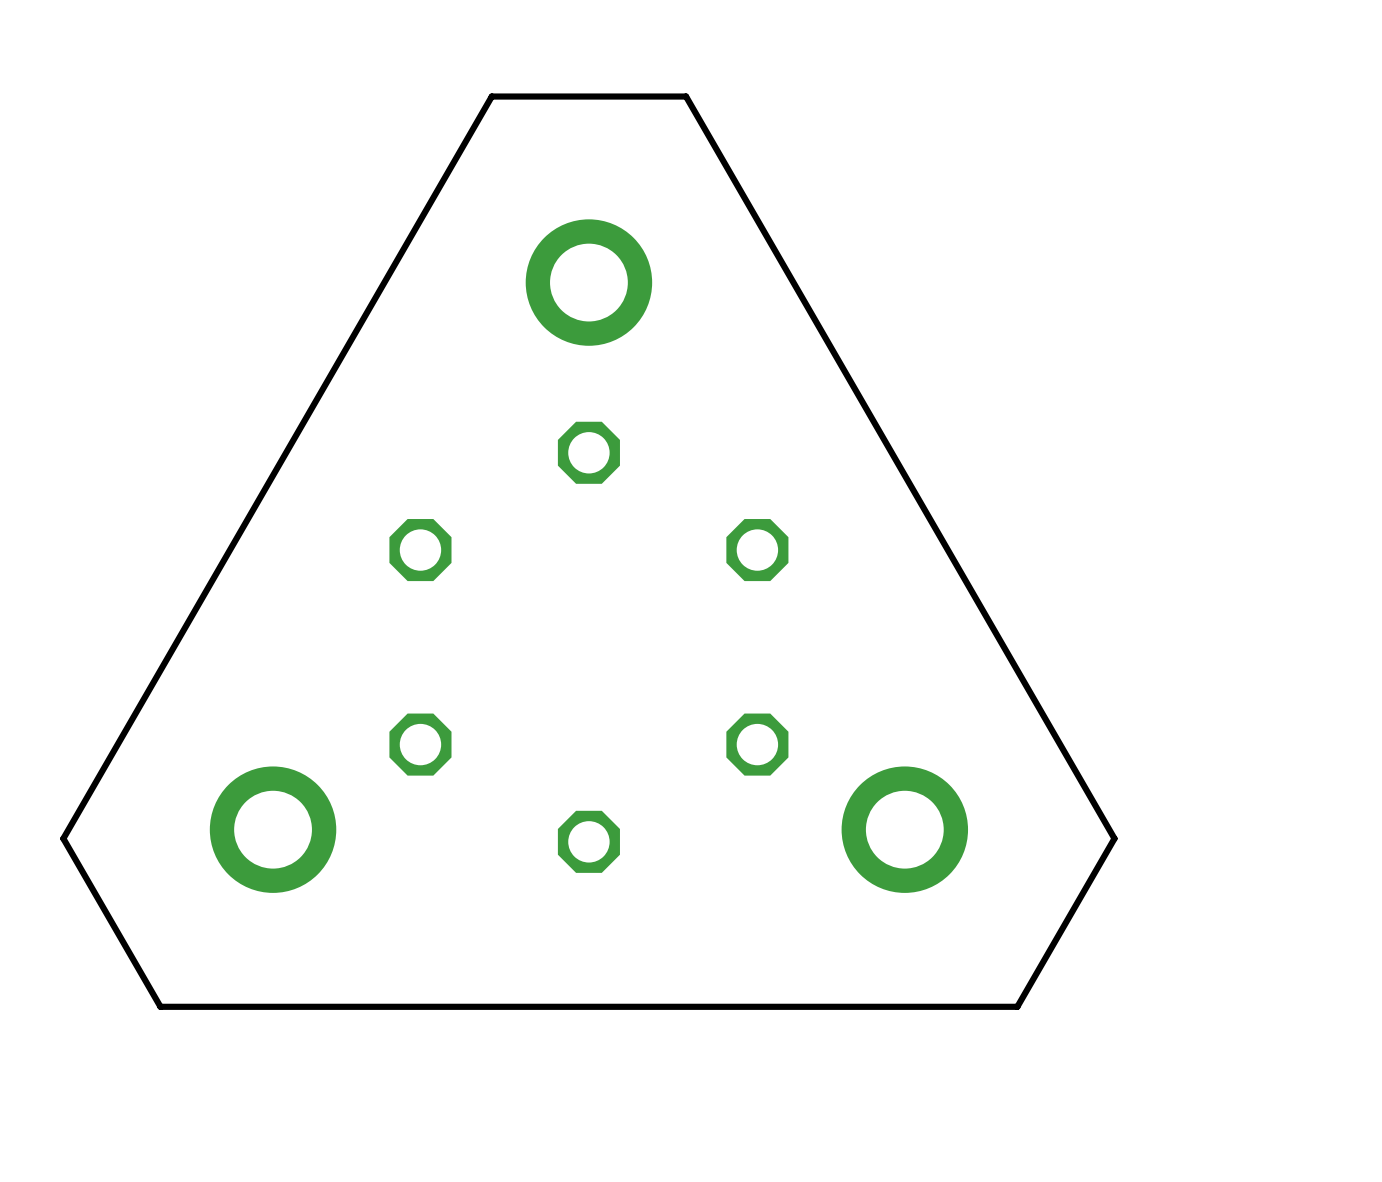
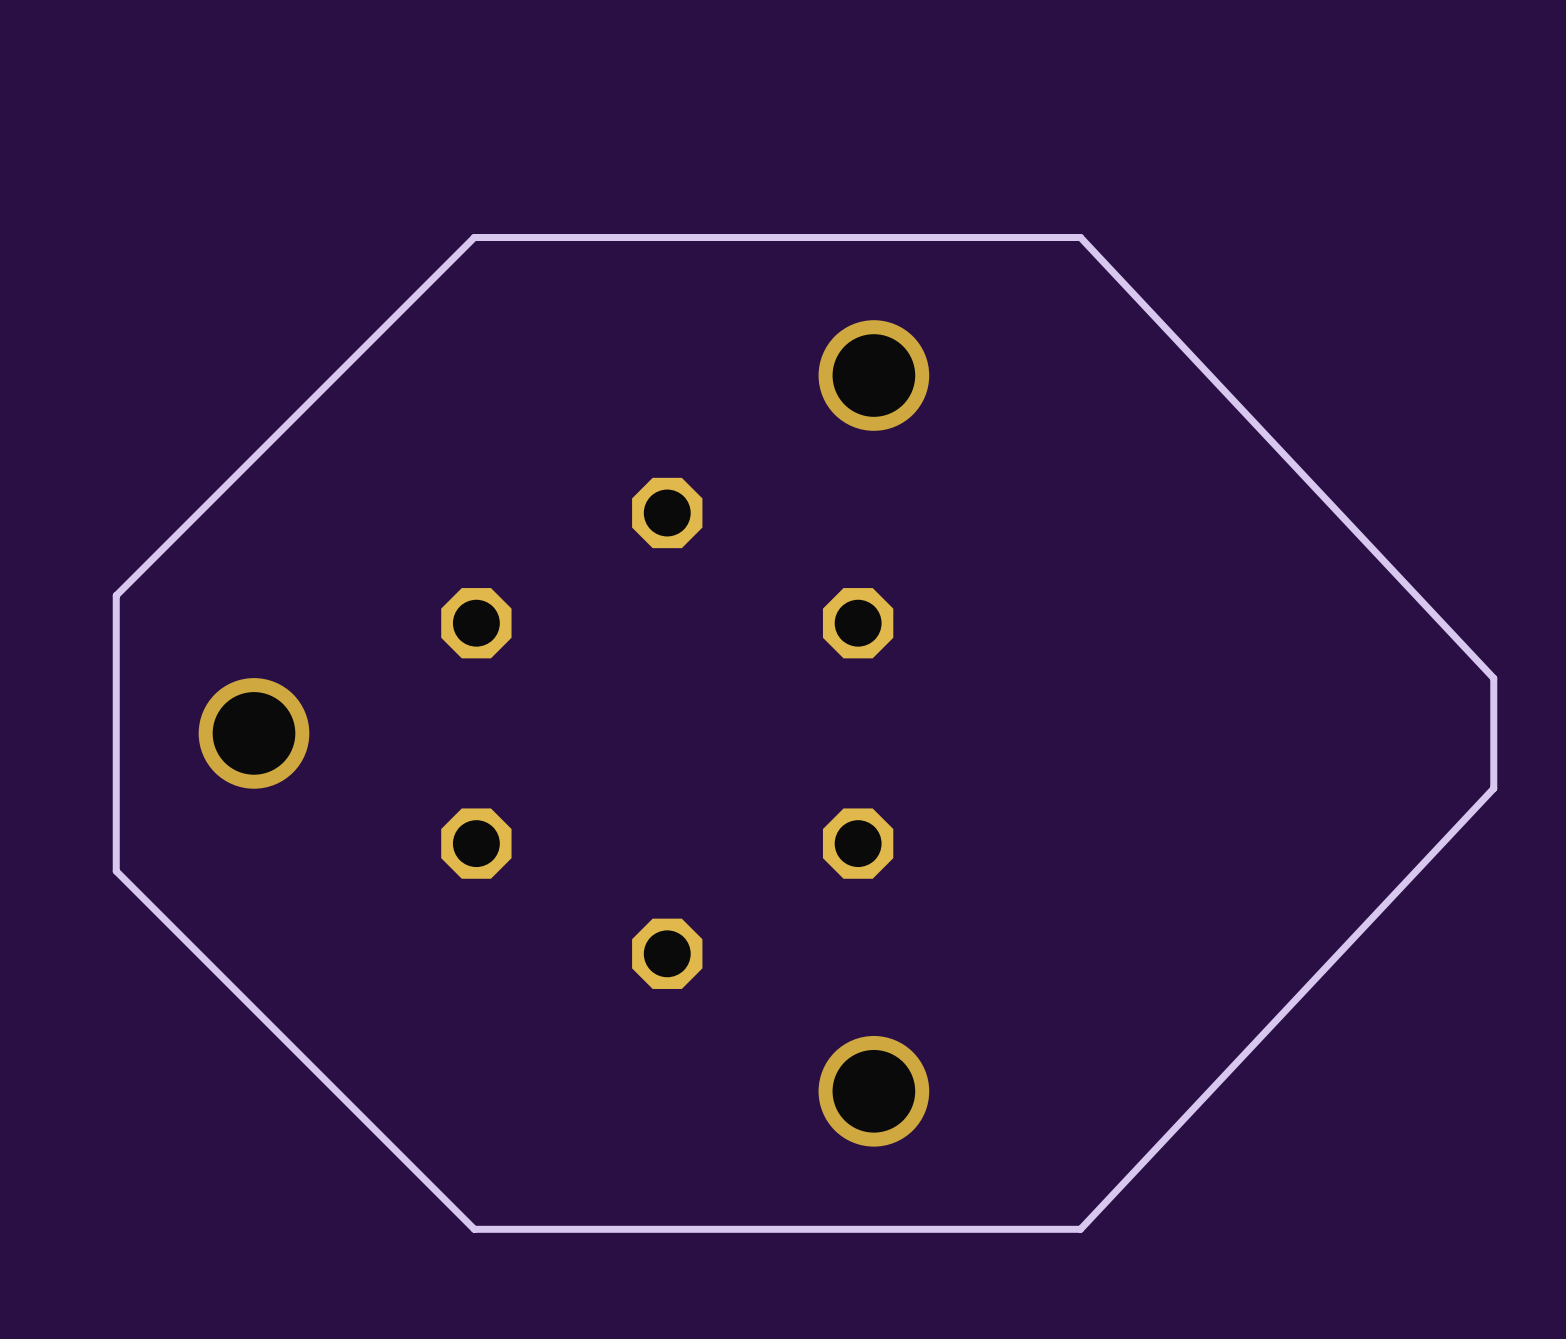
board edge: (686, 96) (491, 96) (63, 838) (160, 1006) (1017, 1006) (1114, 838) (686, 96) -> (1080, 237) (1493, 678) (1493, 788) (1080, 1229) (474, 1229) (116, 871) (116, 595) (474, 237) (1080, 237)
via: (588, 282) -> none
via: none -> (873, 375)
via: none -> (254, 733)
via: (273, 829) -> none
via: (904, 829) -> none
via: none -> (873, 1091)

